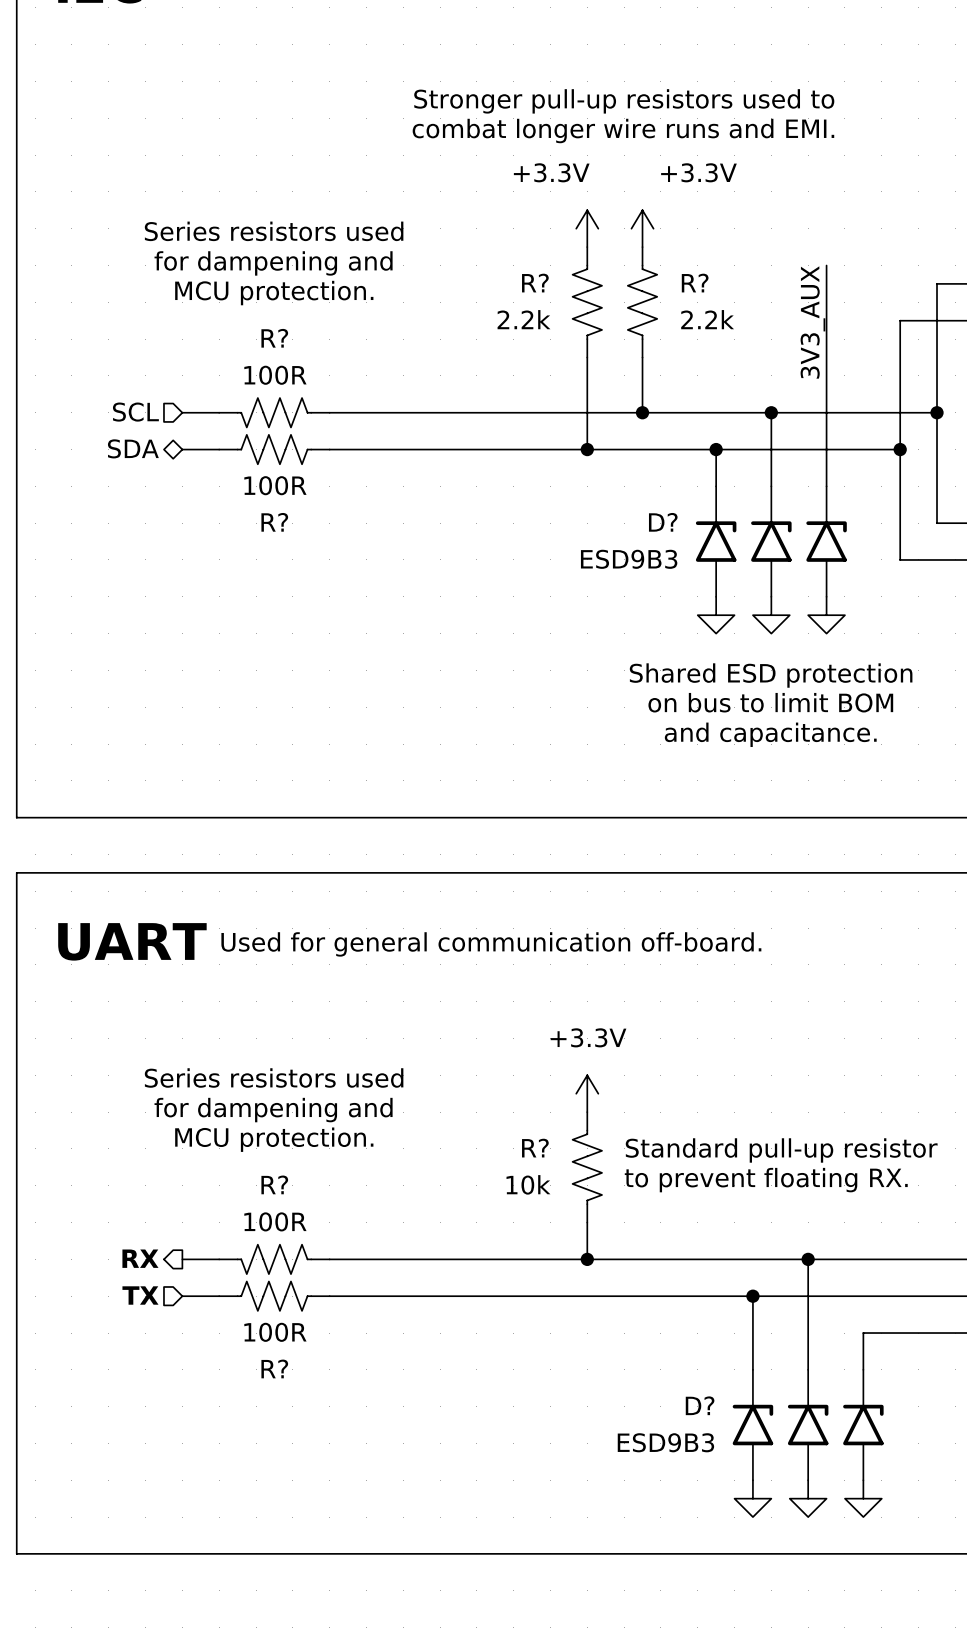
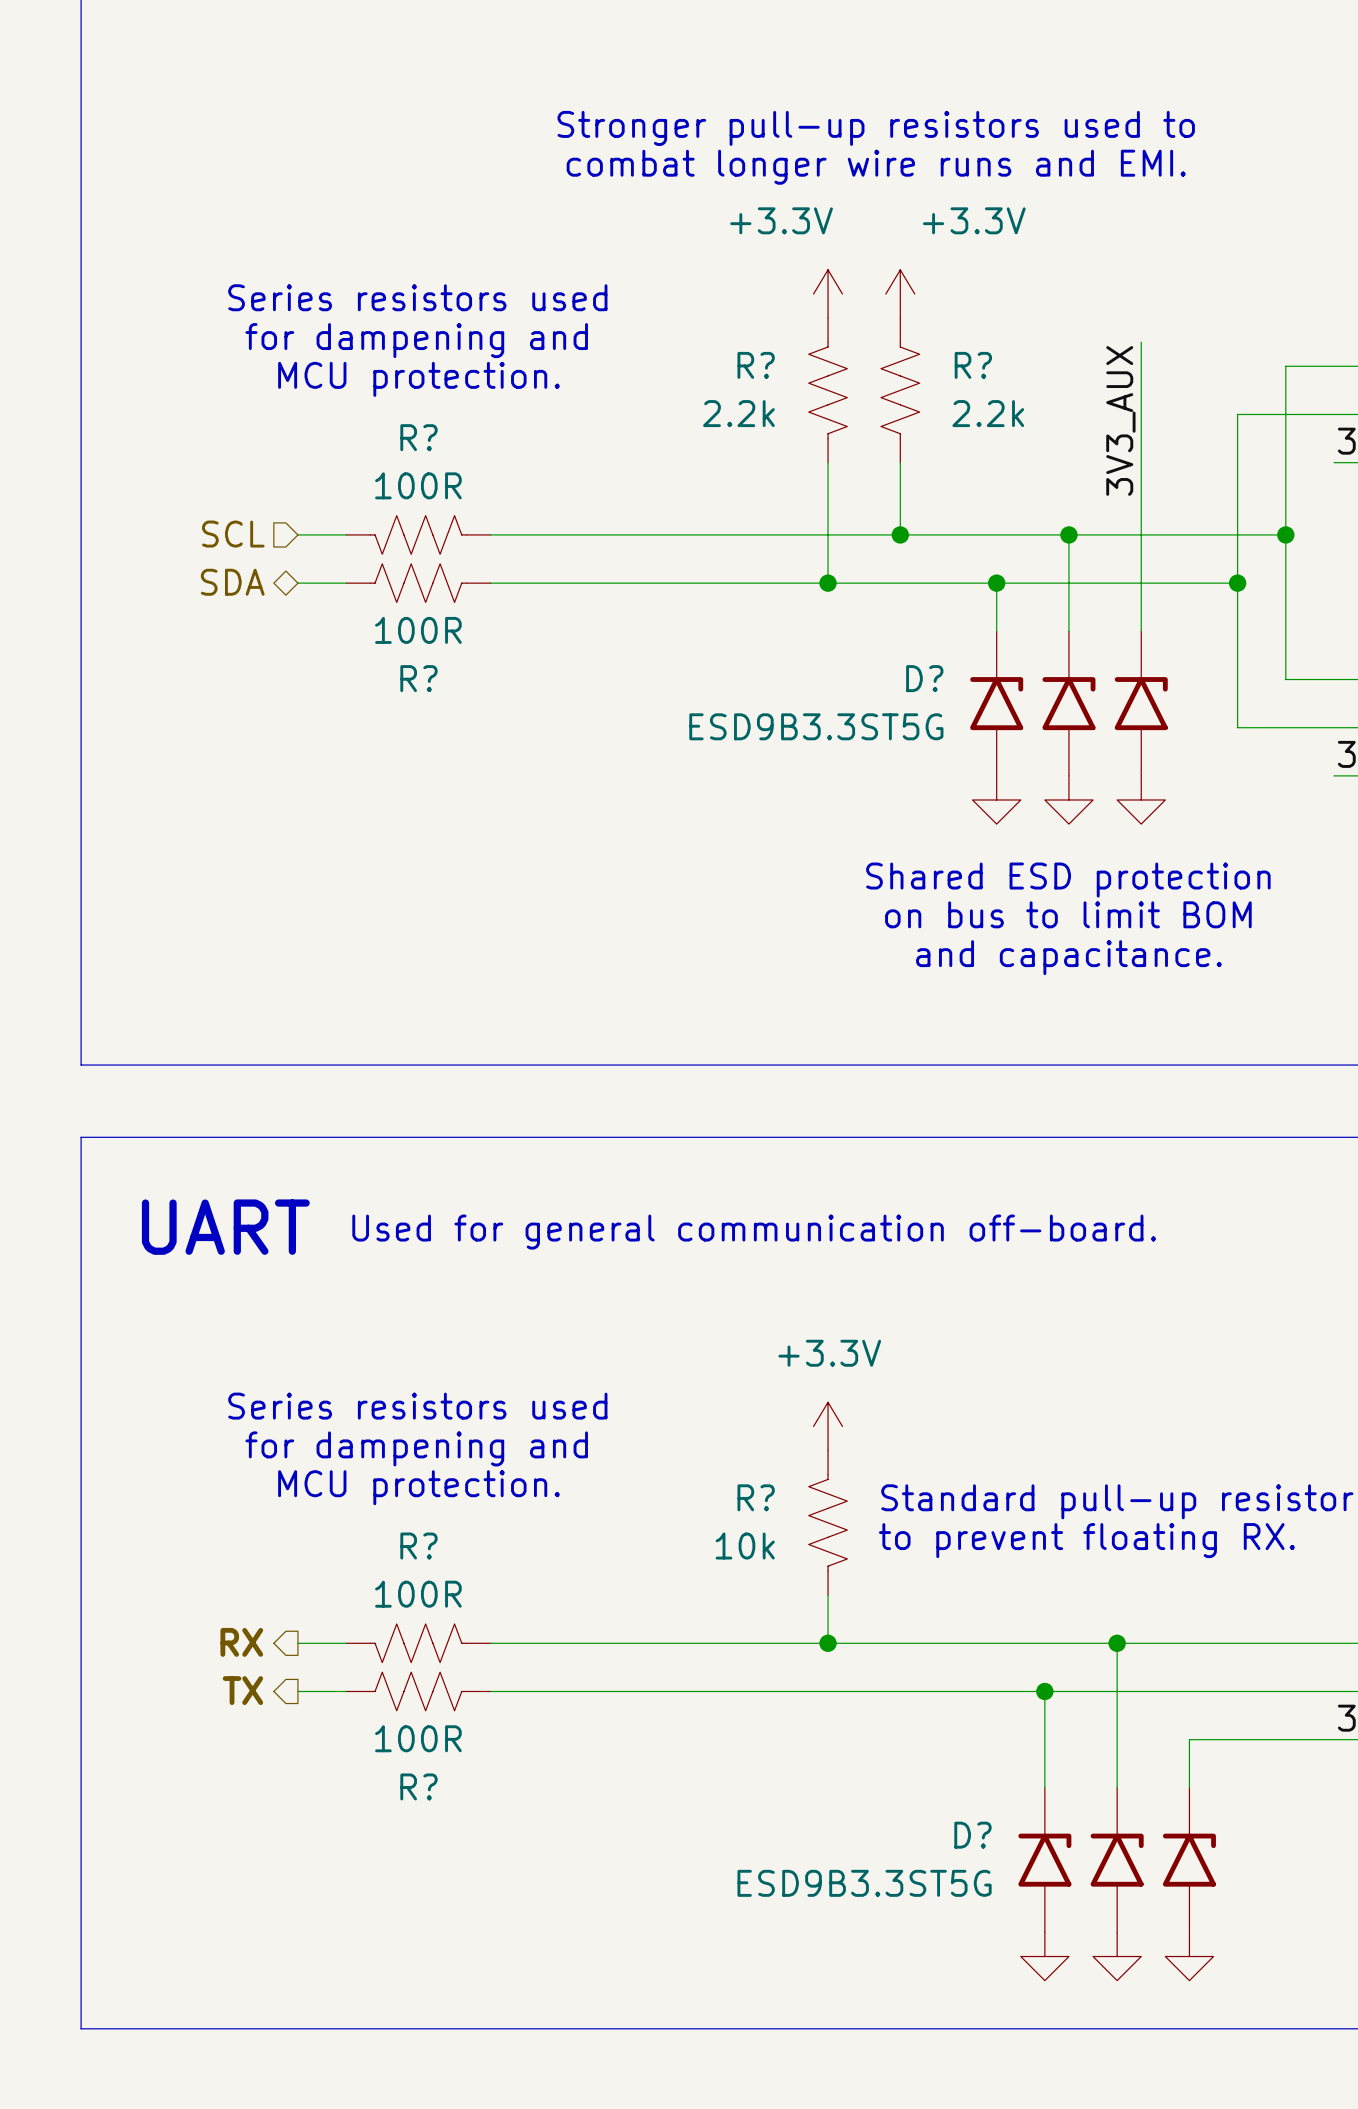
D? value: ESD9B3 (629, 559) -> ESD9B3.3ST5G (816, 726)
hierarchical label shape: input (140, 1295) -> output (242, 1690)
D? value: ESD9B3 (665, 1442) -> ESD9B3.3ST5G (864, 1883)

